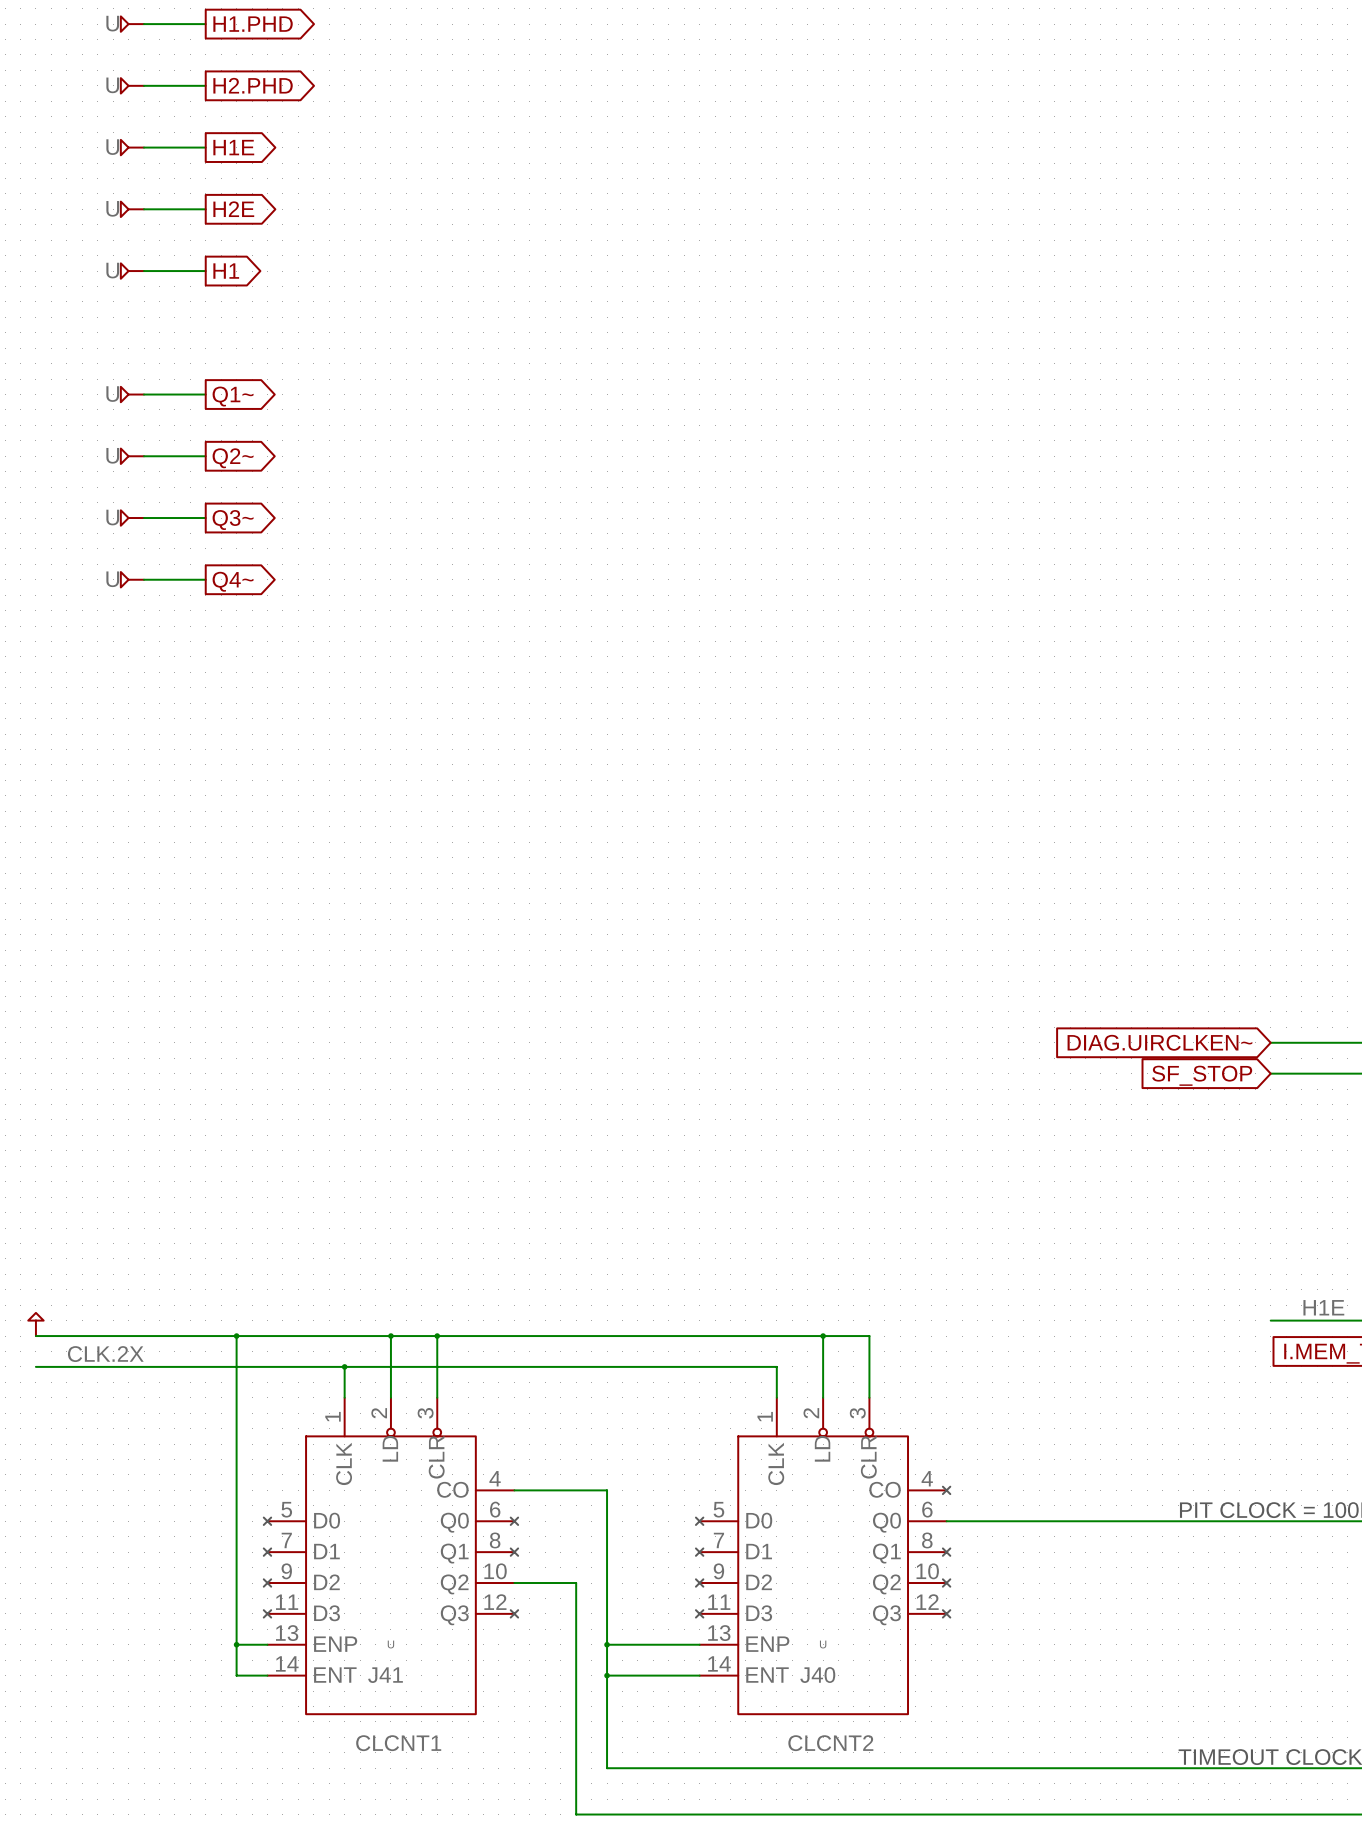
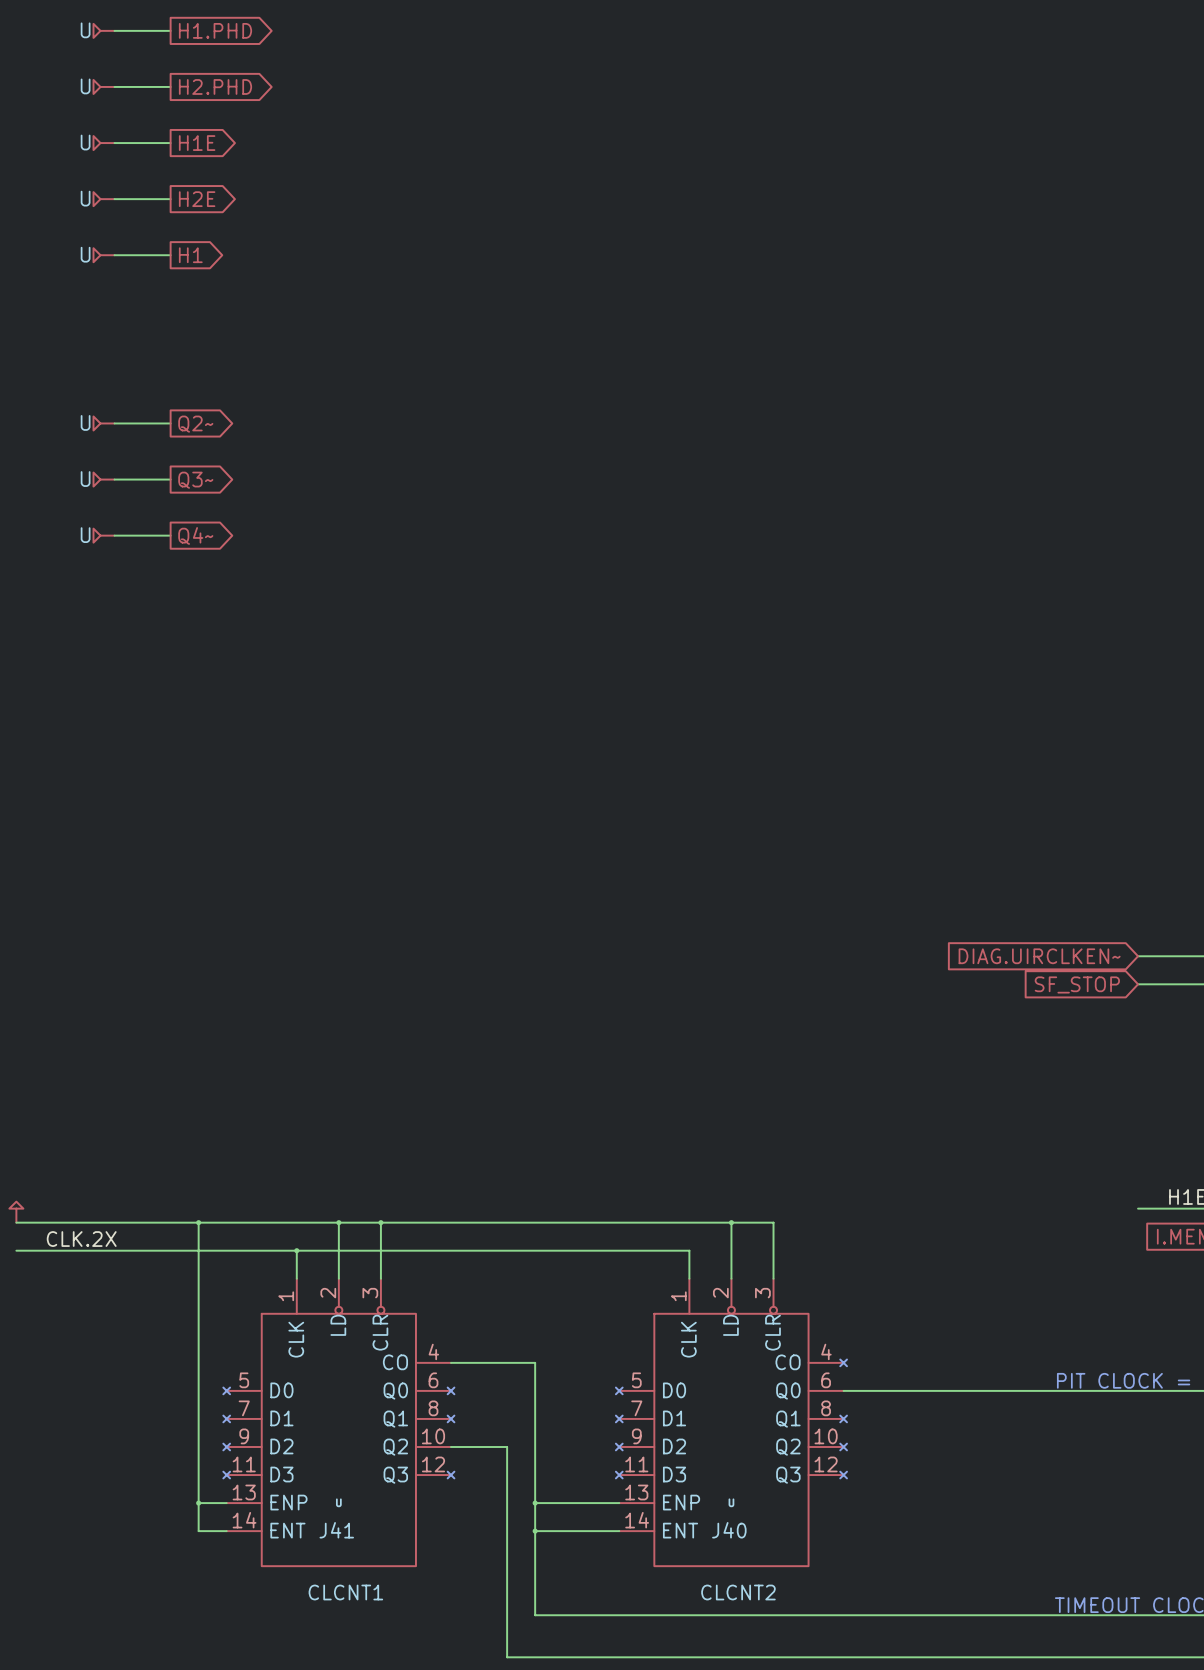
U: (132, 394) -> none
wire: (144, 394) (205, 394) -> none
global label: Q1~ (233, 396) -> none

